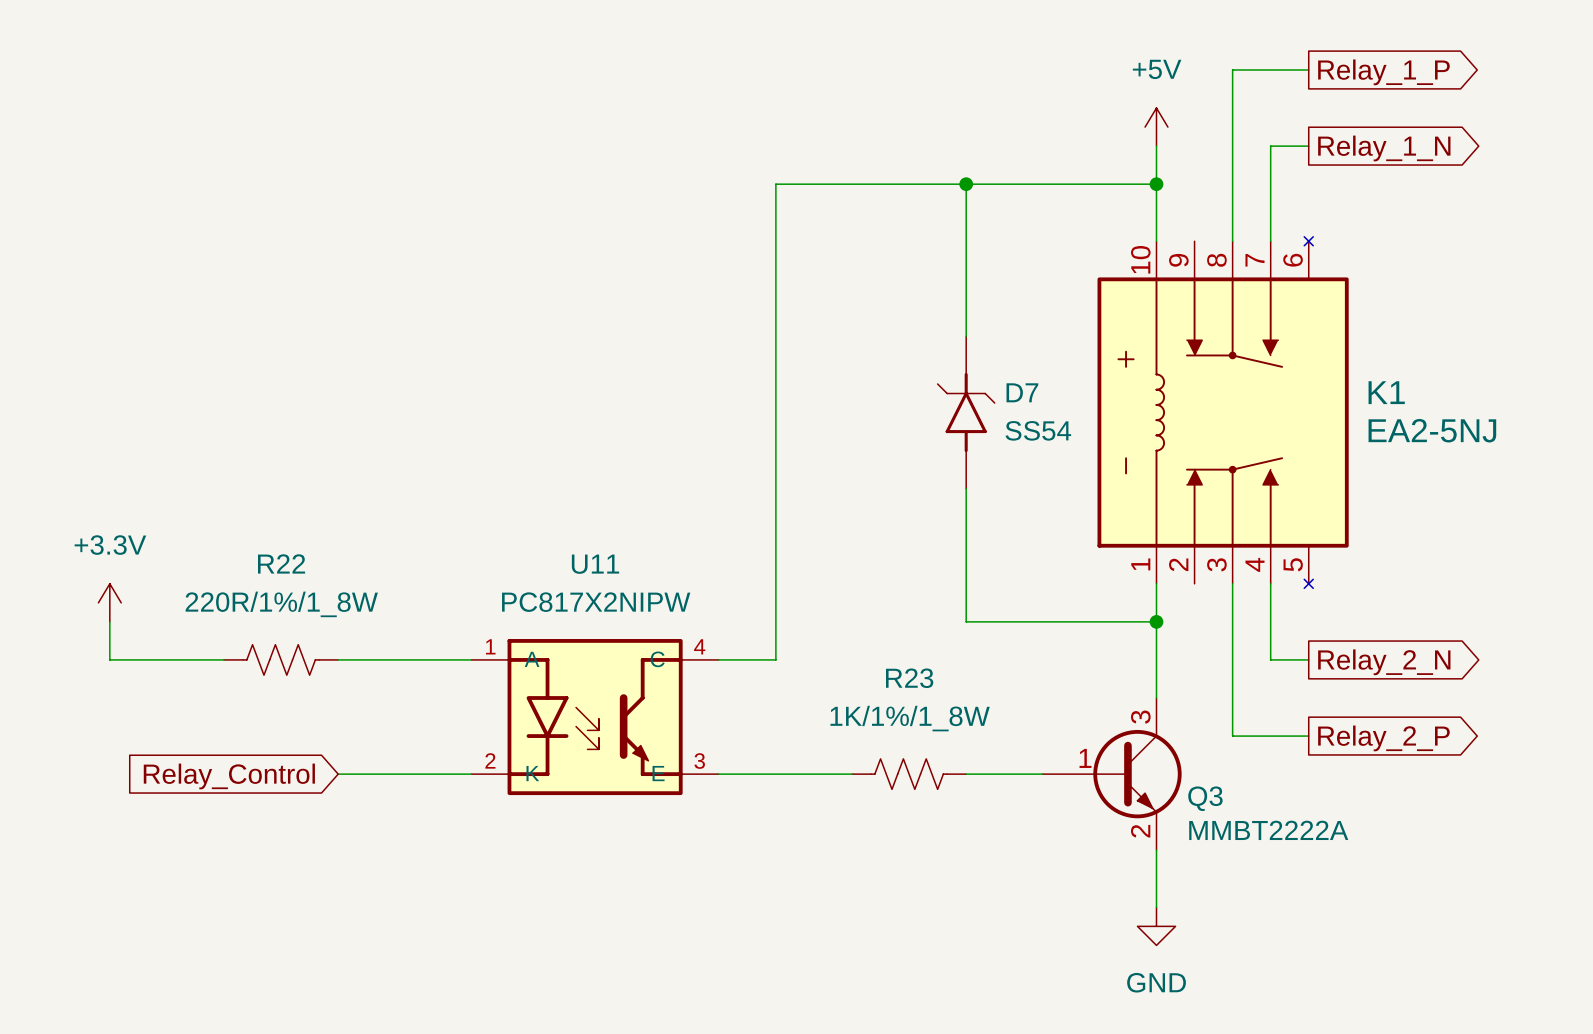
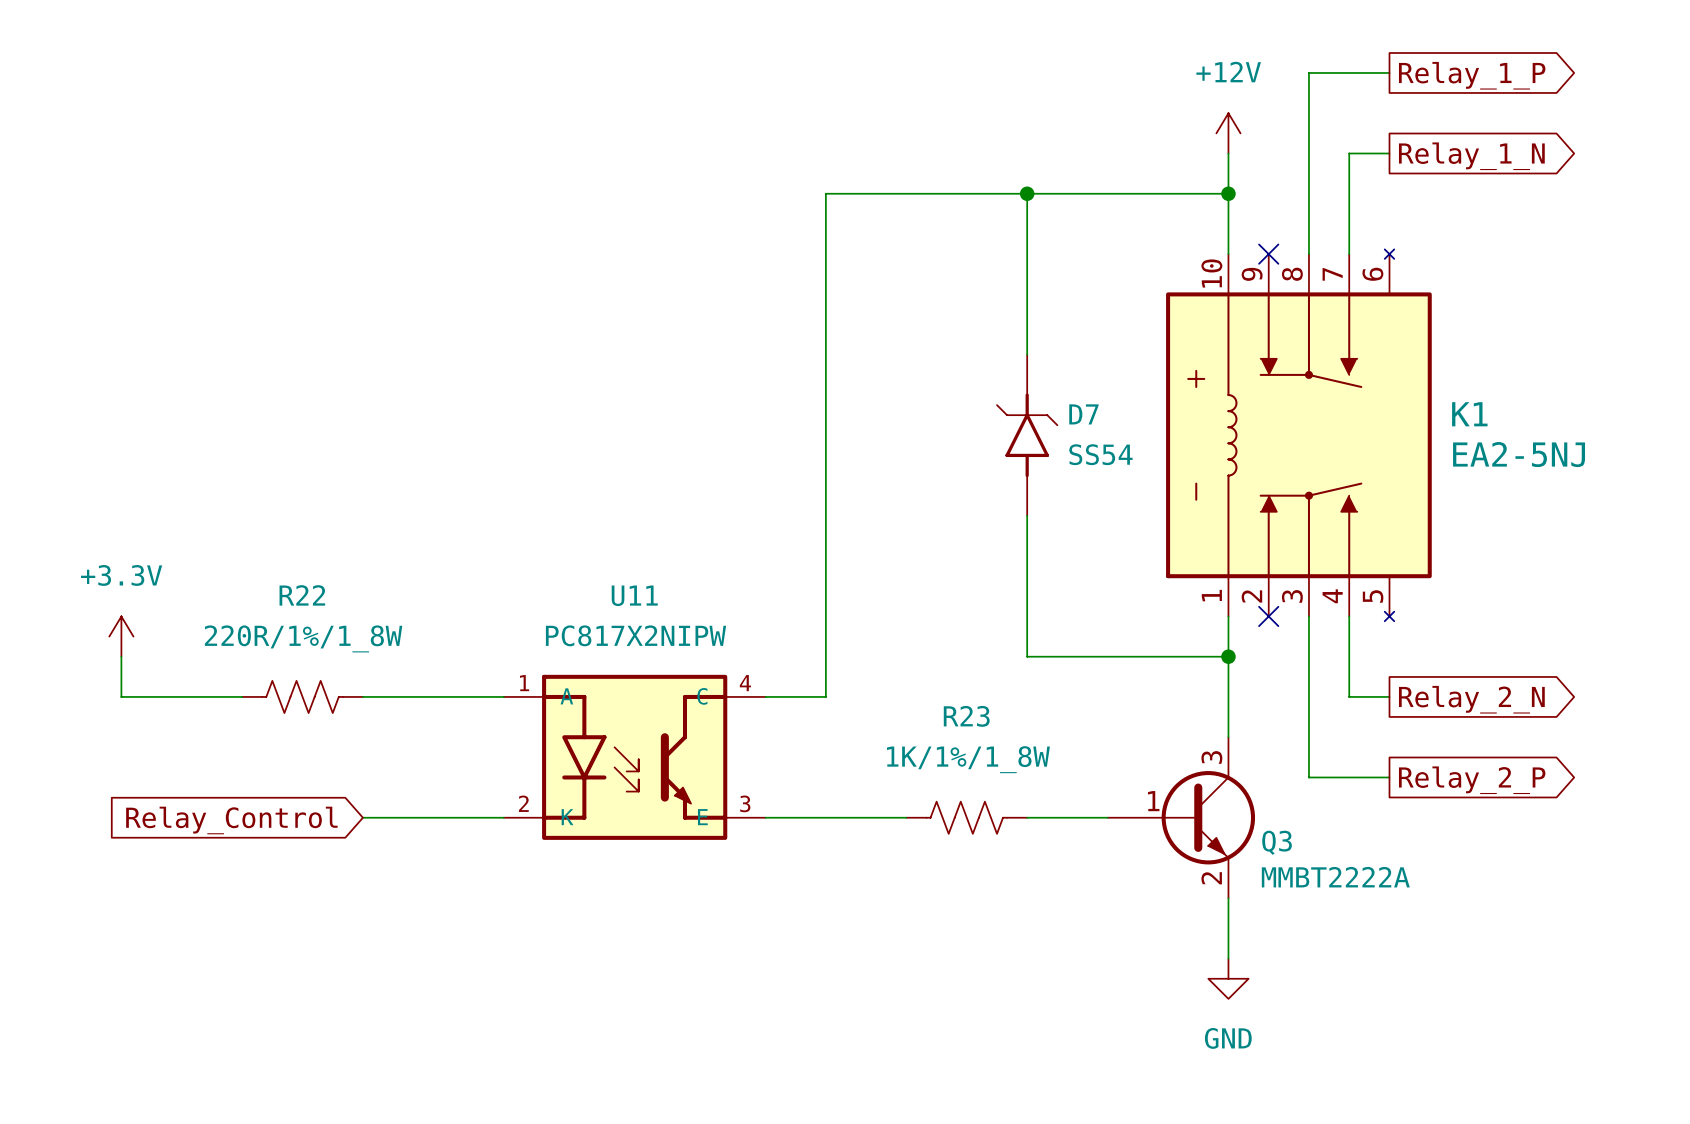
power symbol: +5V (1156, 127) -> +12V (1228, 133)
no-connect mark: none -> (1268, 254)
no-connect mark: none -> (1268, 616)

